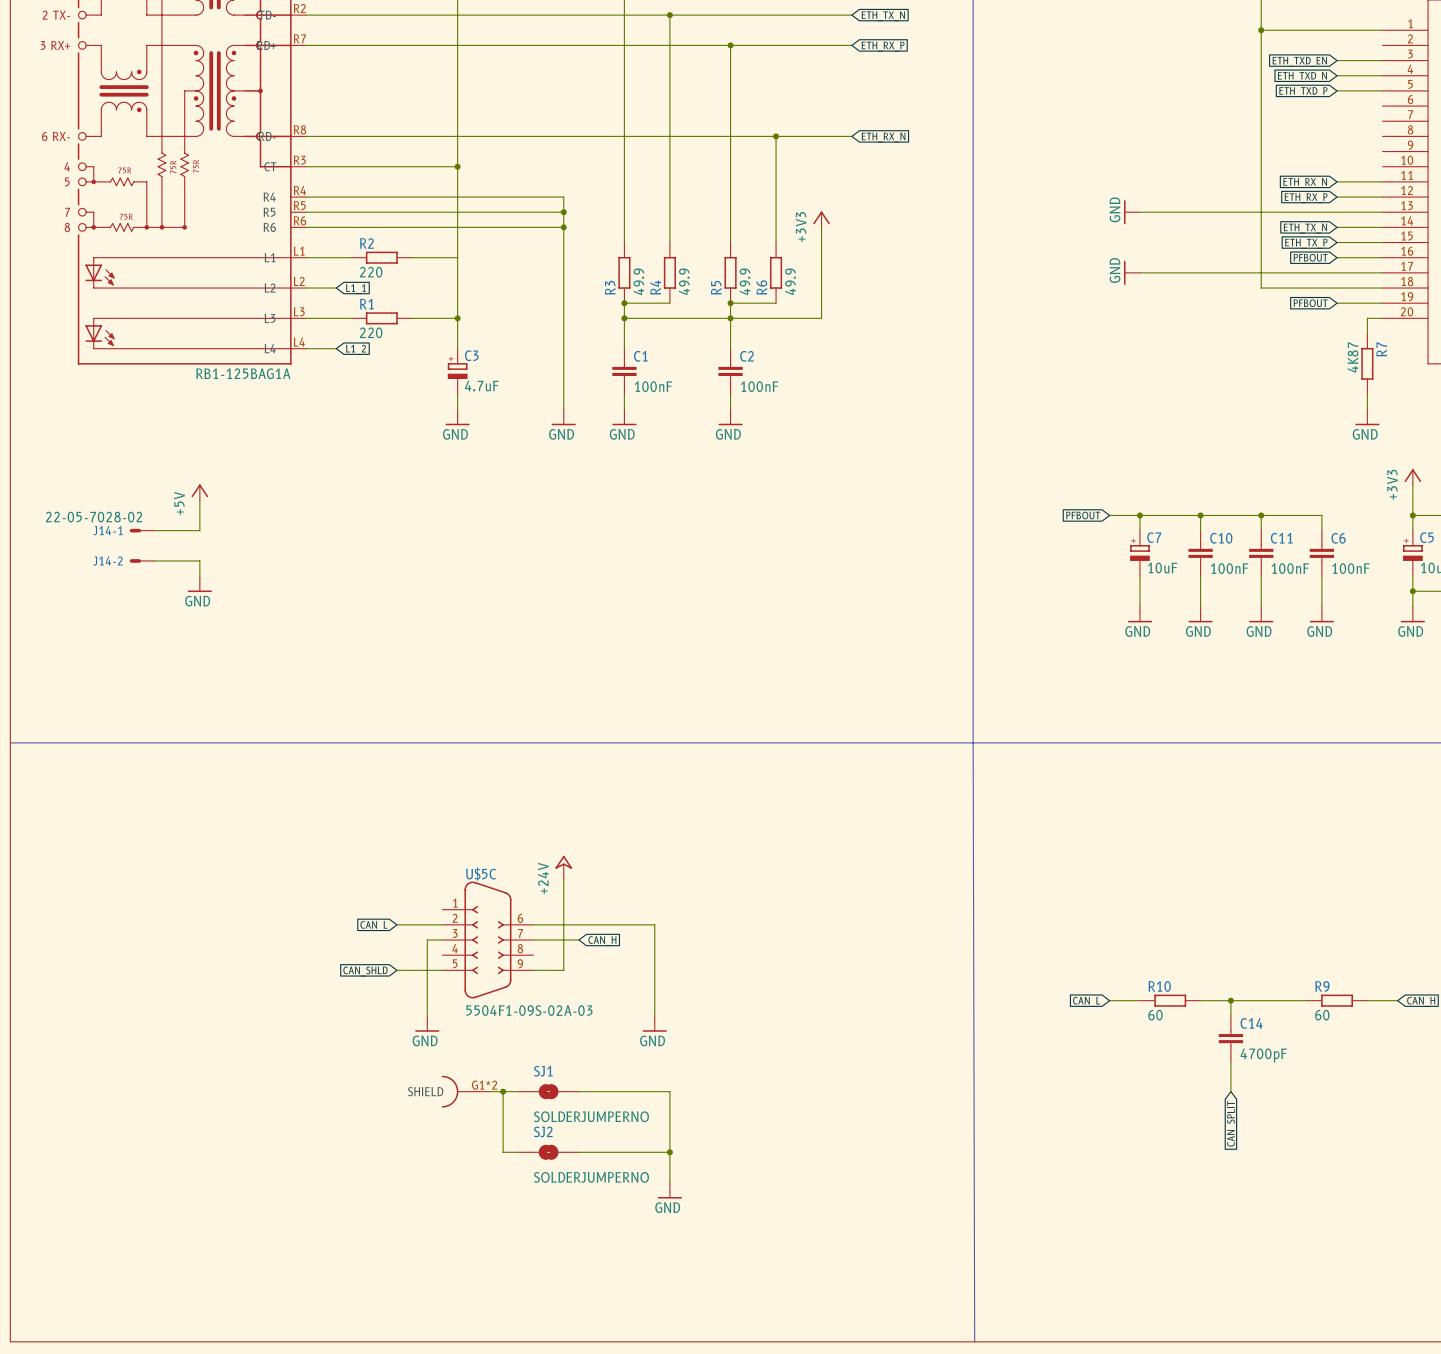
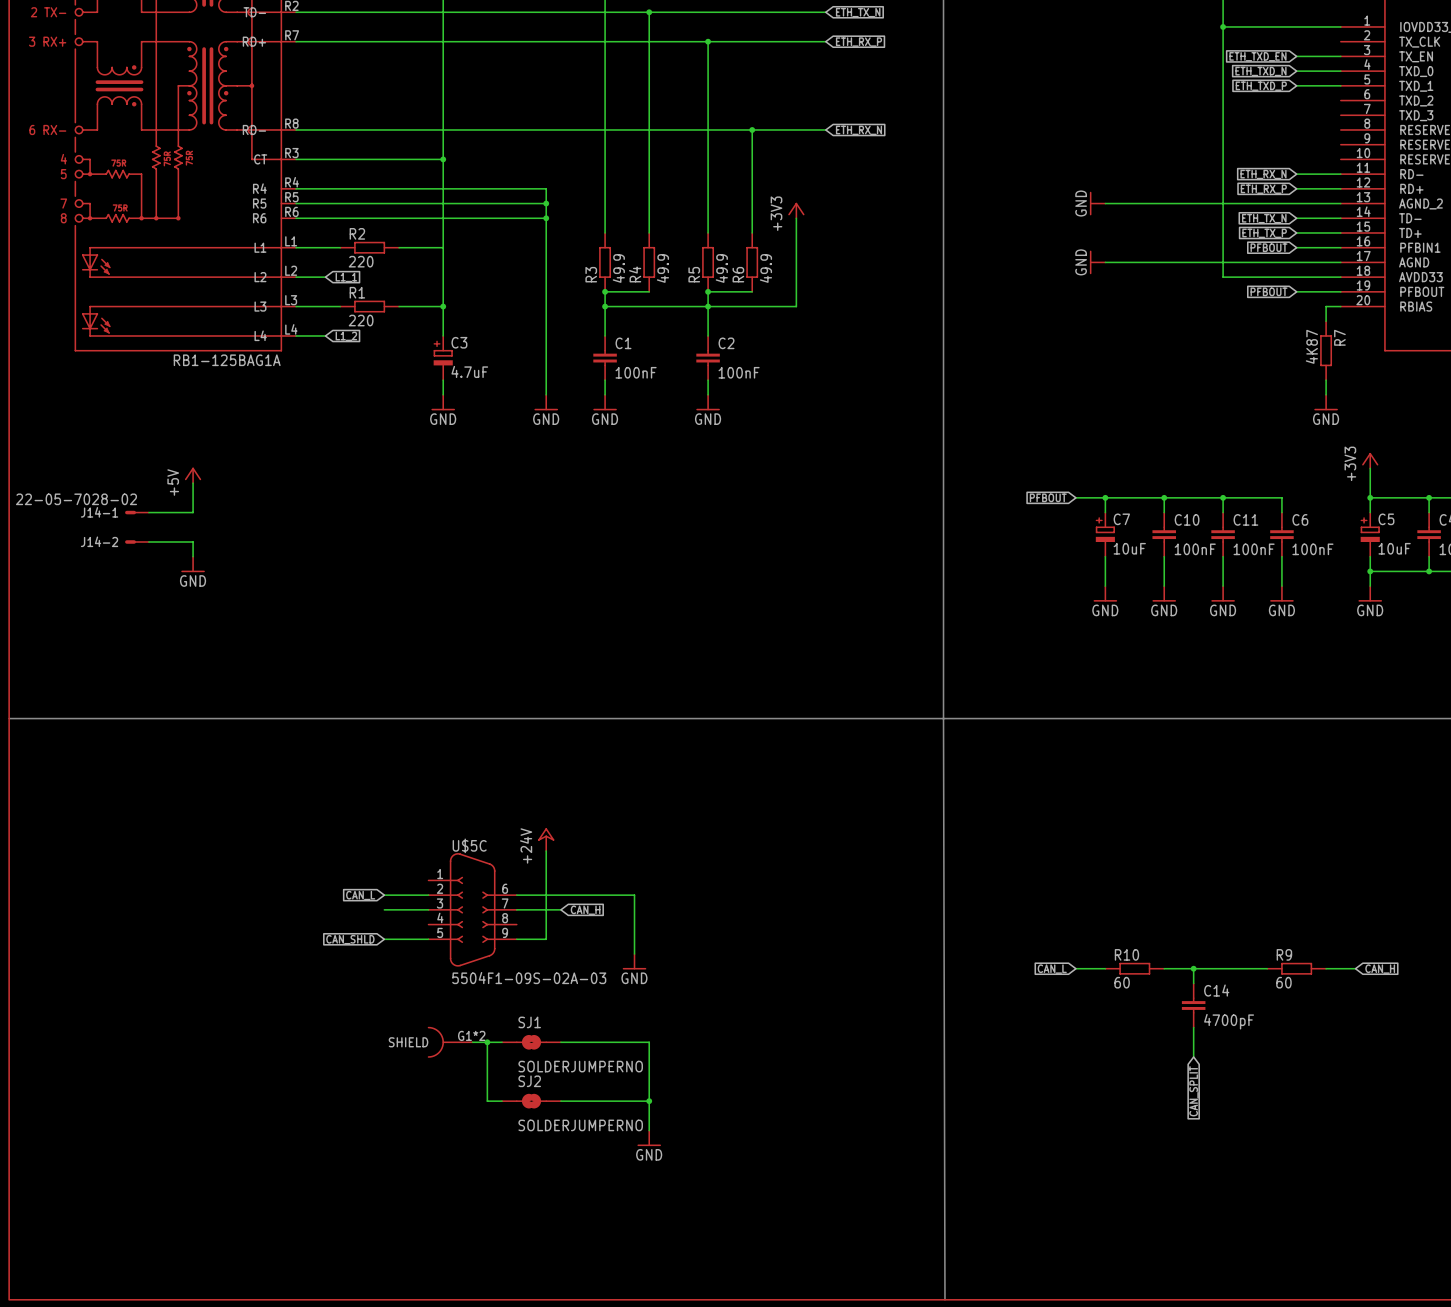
wire: (427, 940) (427, 1015) -> (413, 909) (384, 909)
power symbol: GND (427, 1023) -> none
power symbol position: GND (654, 1023) -> GND (634, 961)
wire: none -> (487, 1042) (487, 1057)
part position: (464, 1091) -> (450, 1042)
wire: (487, 1091) (518, 1091) -> (472, 1042) (502, 1042)
junction position: (503, 1091) -> (487, 1042)
SJ1 position: (548, 1091) -> (531, 1042)
wire: (578, 1091) (669, 1091) -> (560, 1042) (649, 1042) (649, 1057)
wire: (503, 1137) (503, 1152) (518, 1152) -> (487, 1101) (502, 1101)
SJ2 position: (548, 1152) -> (531, 1101)
wire: (578, 1152) (669, 1152) -> (560, 1101) (649, 1101)
junction position: (669, 1152) -> (649, 1101)
power symbol position: GND (669, 1190) -> GND (649, 1138)

